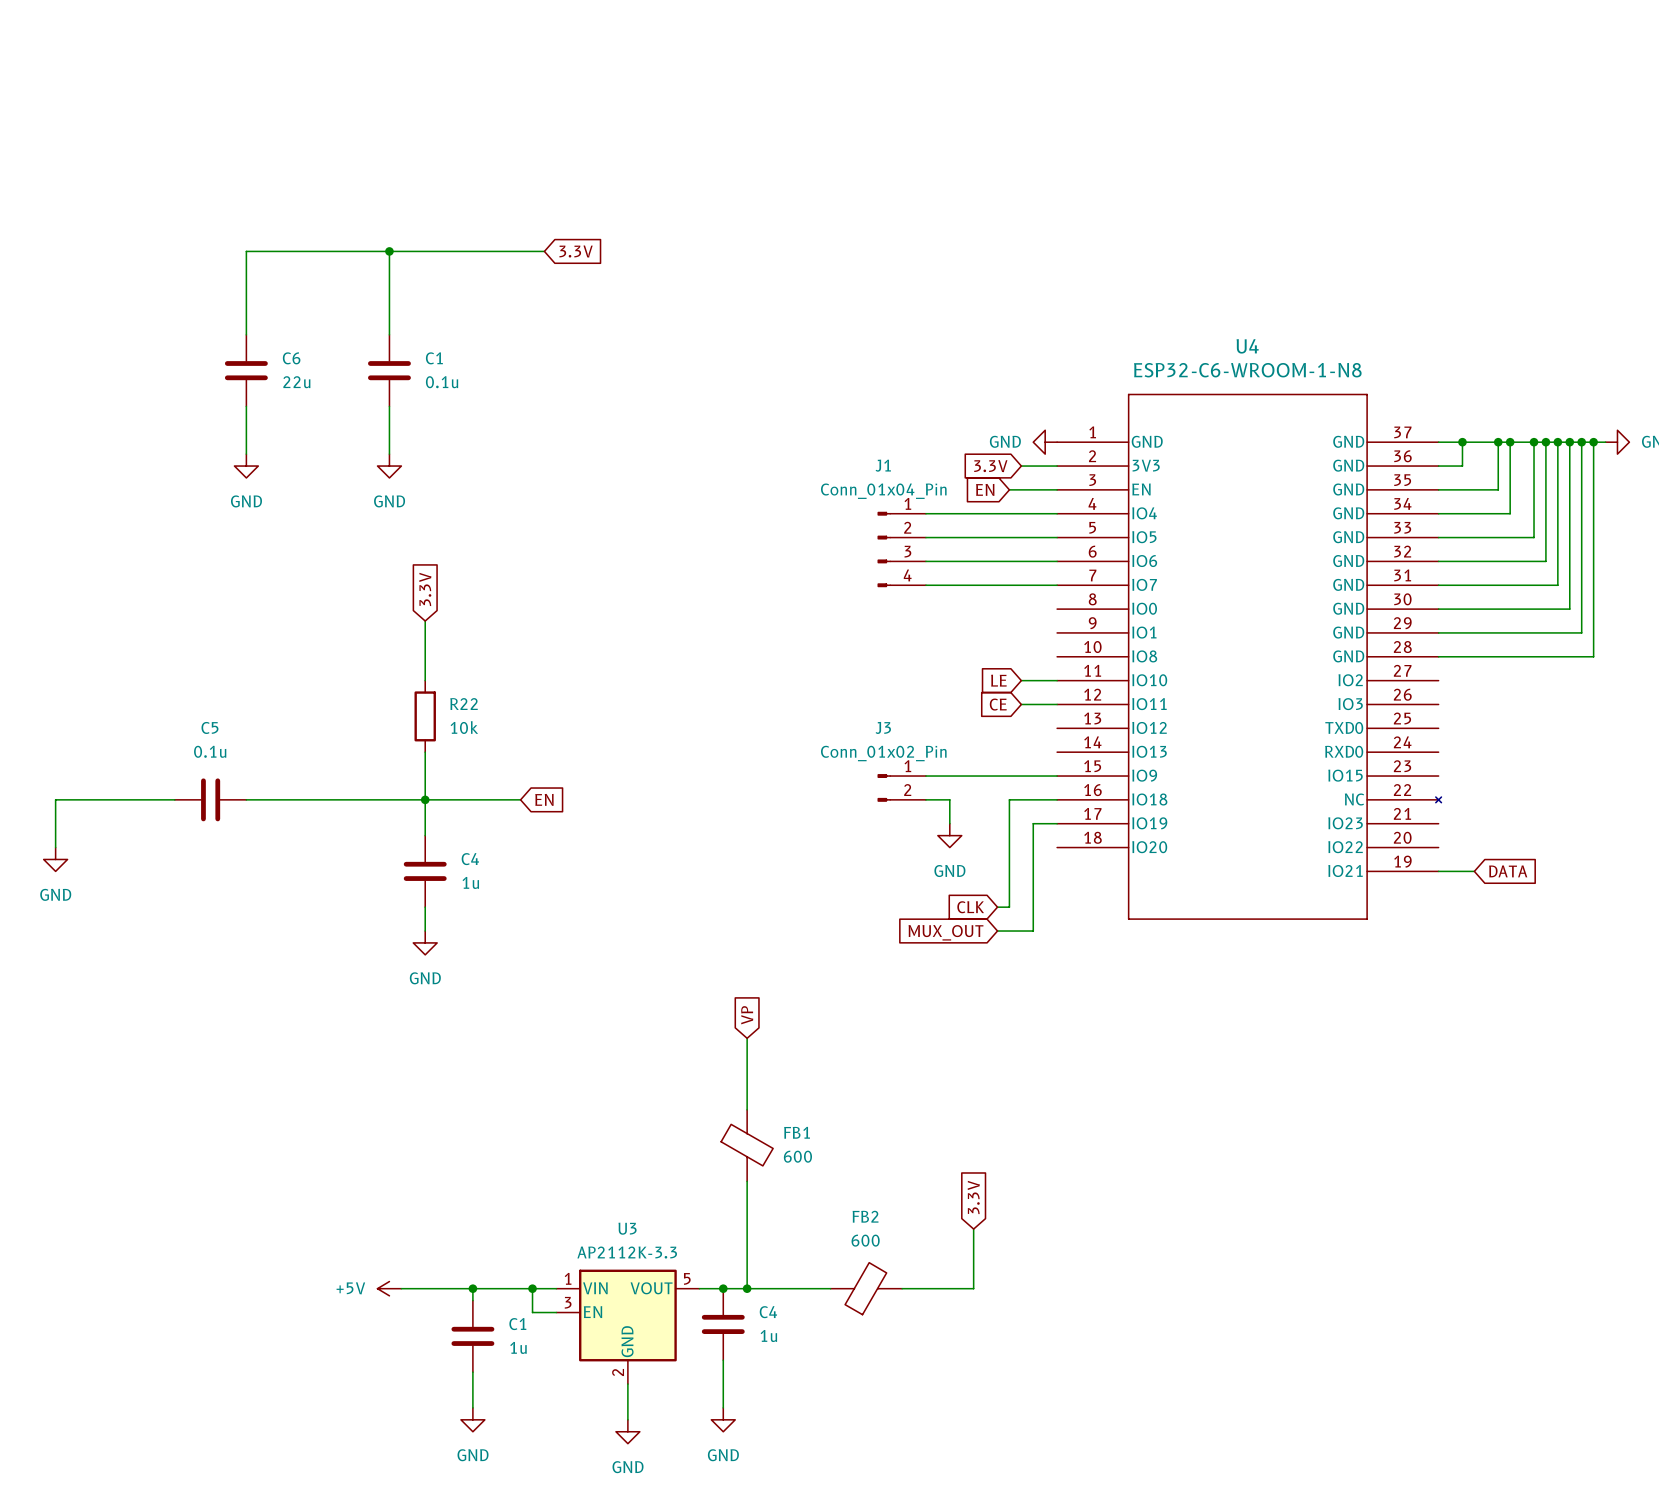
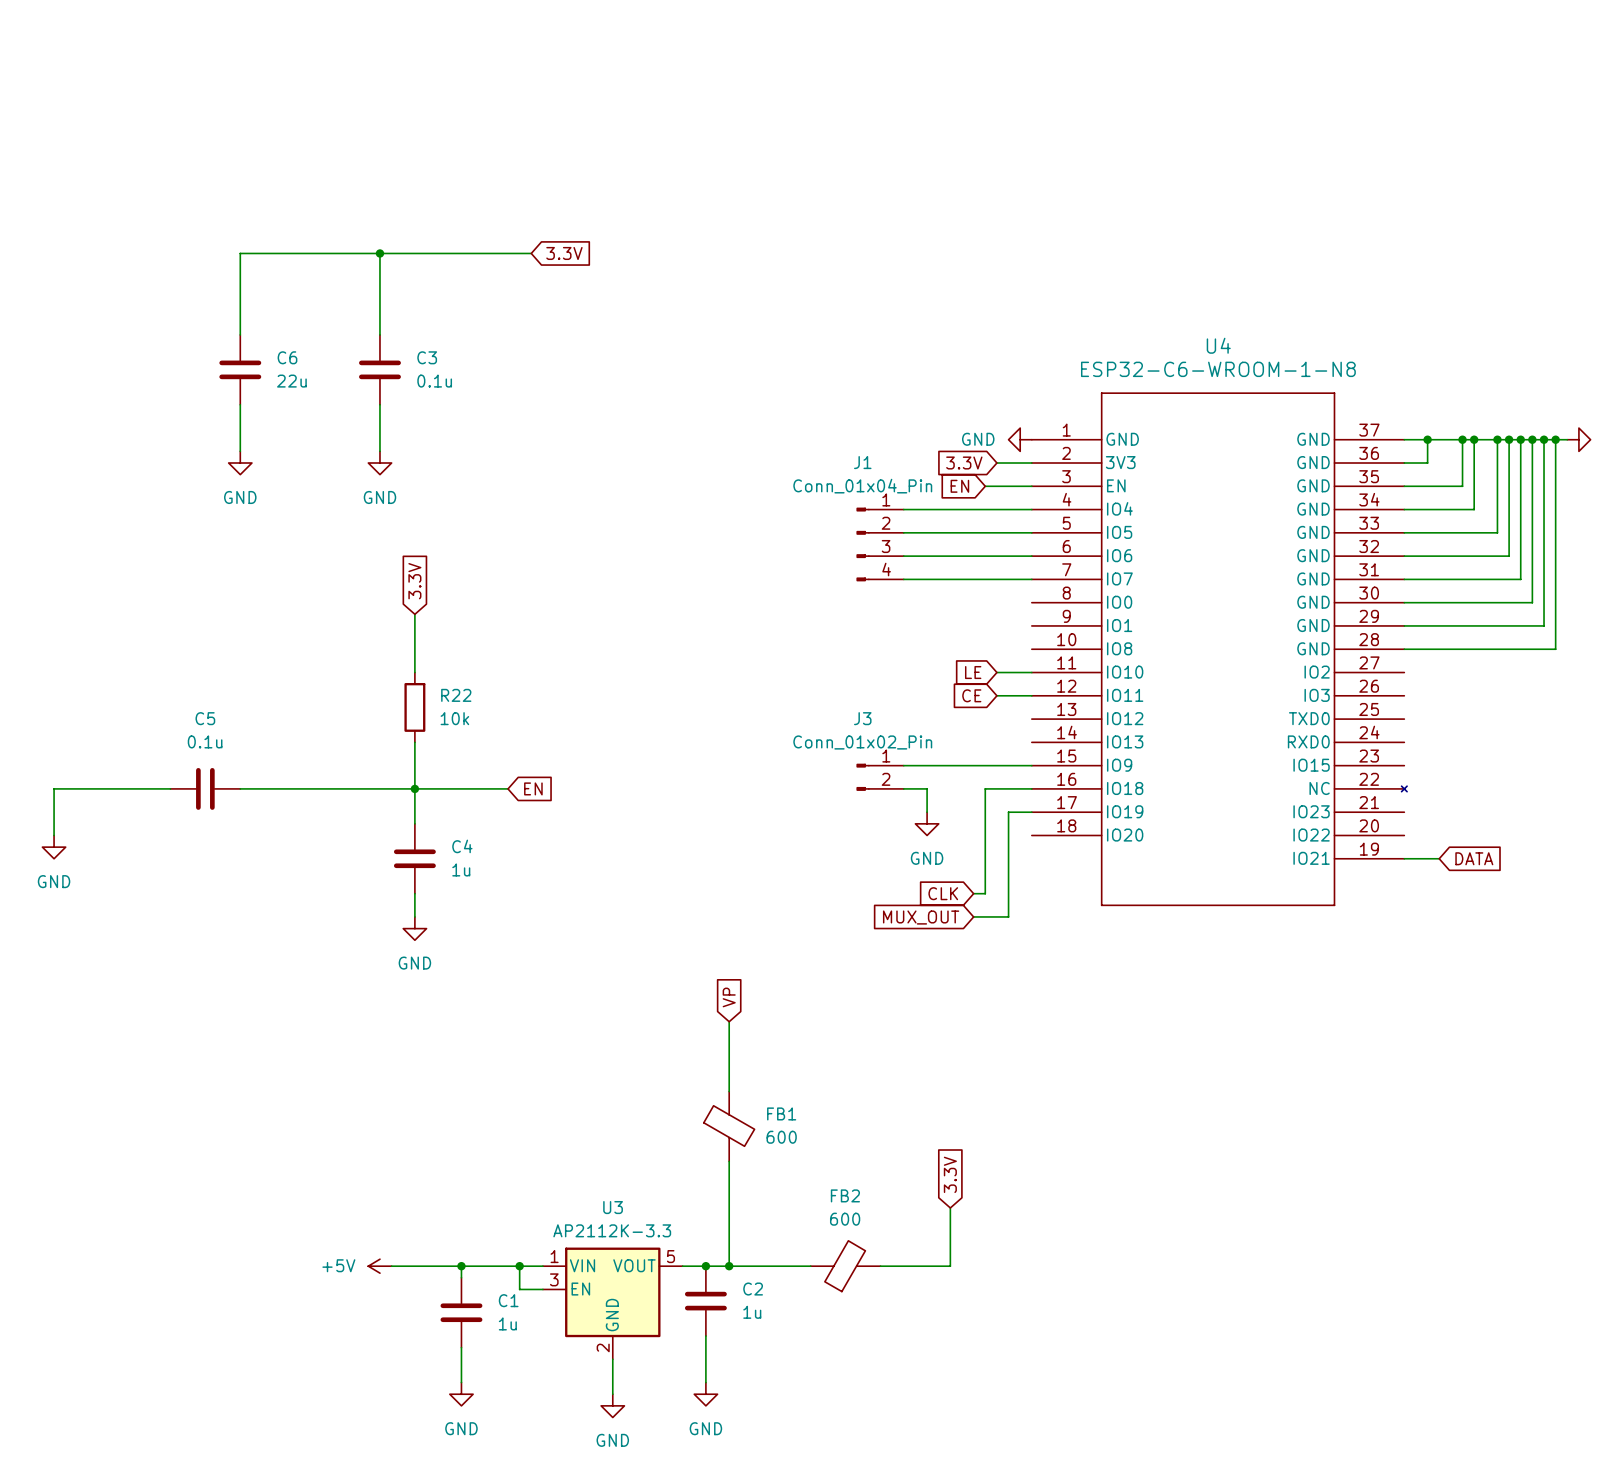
C1 name: C1 (434, 358) -> C3 (427, 357)
C4 name: C4 (768, 1312) -> C2 (753, 1289)

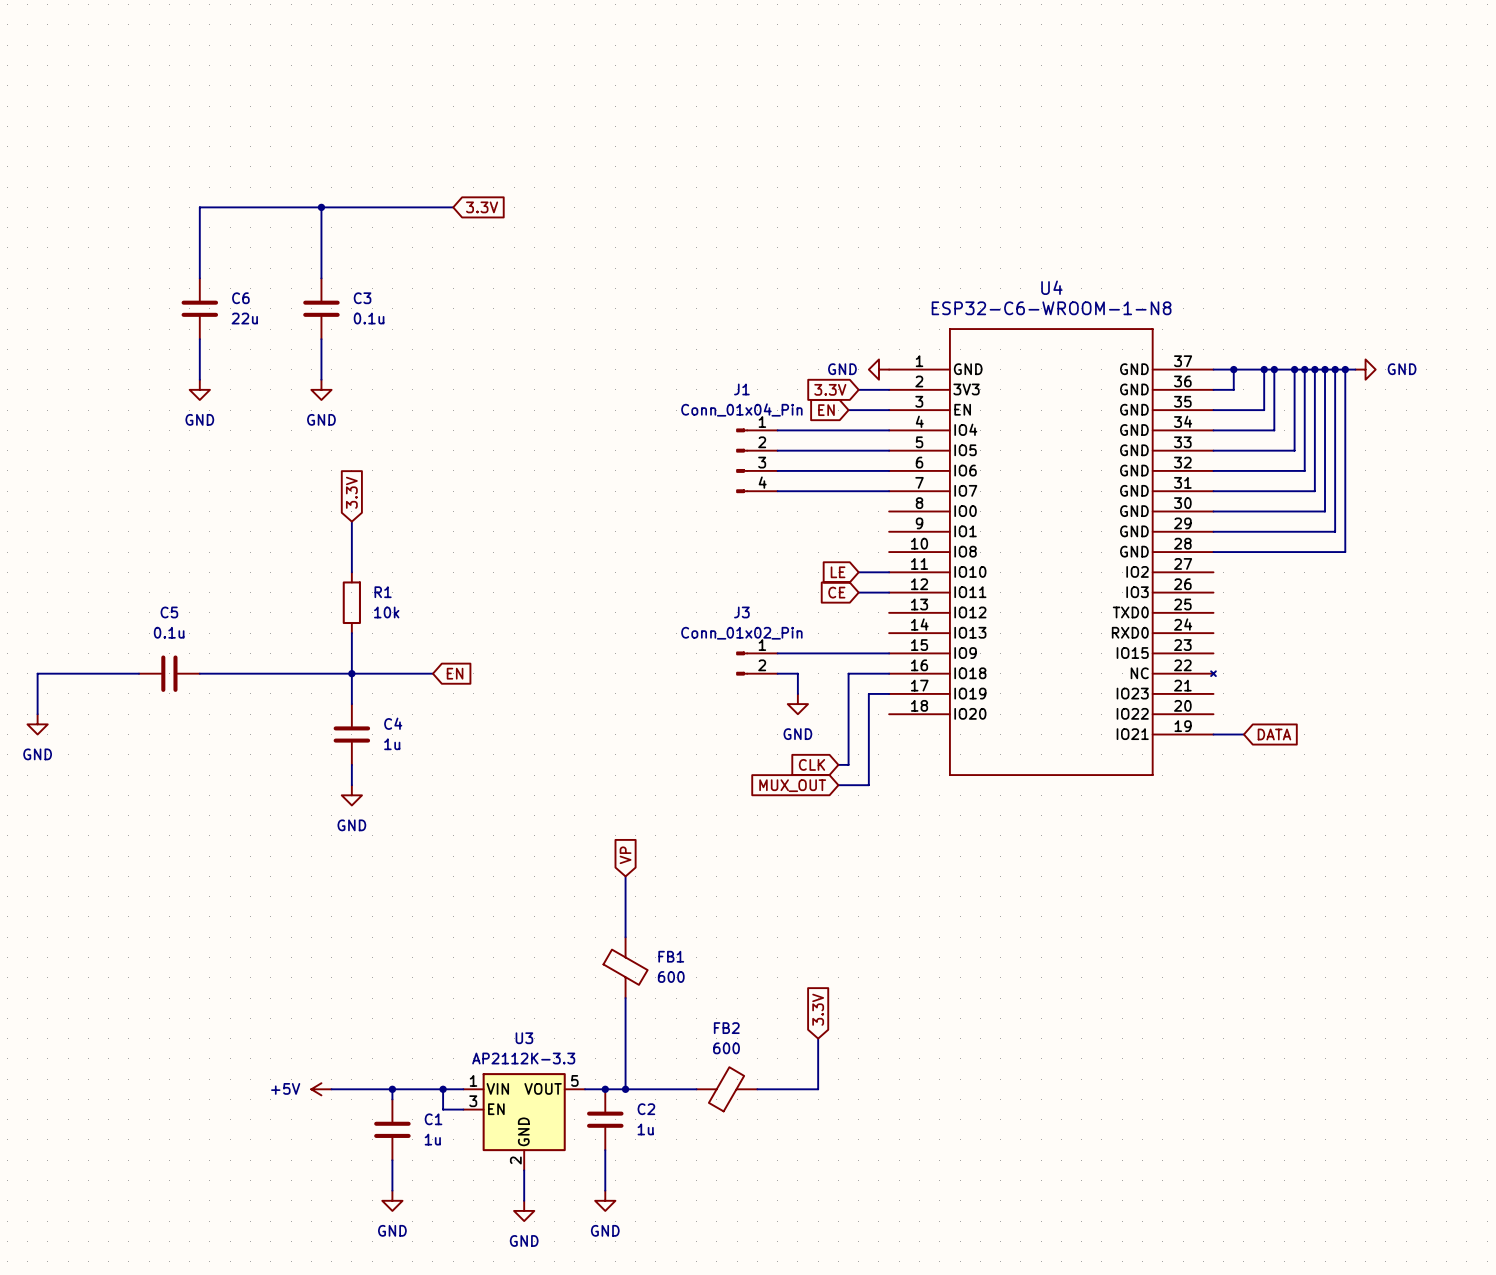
R22 name: R22 (456, 695) -> R1 (383, 592)

